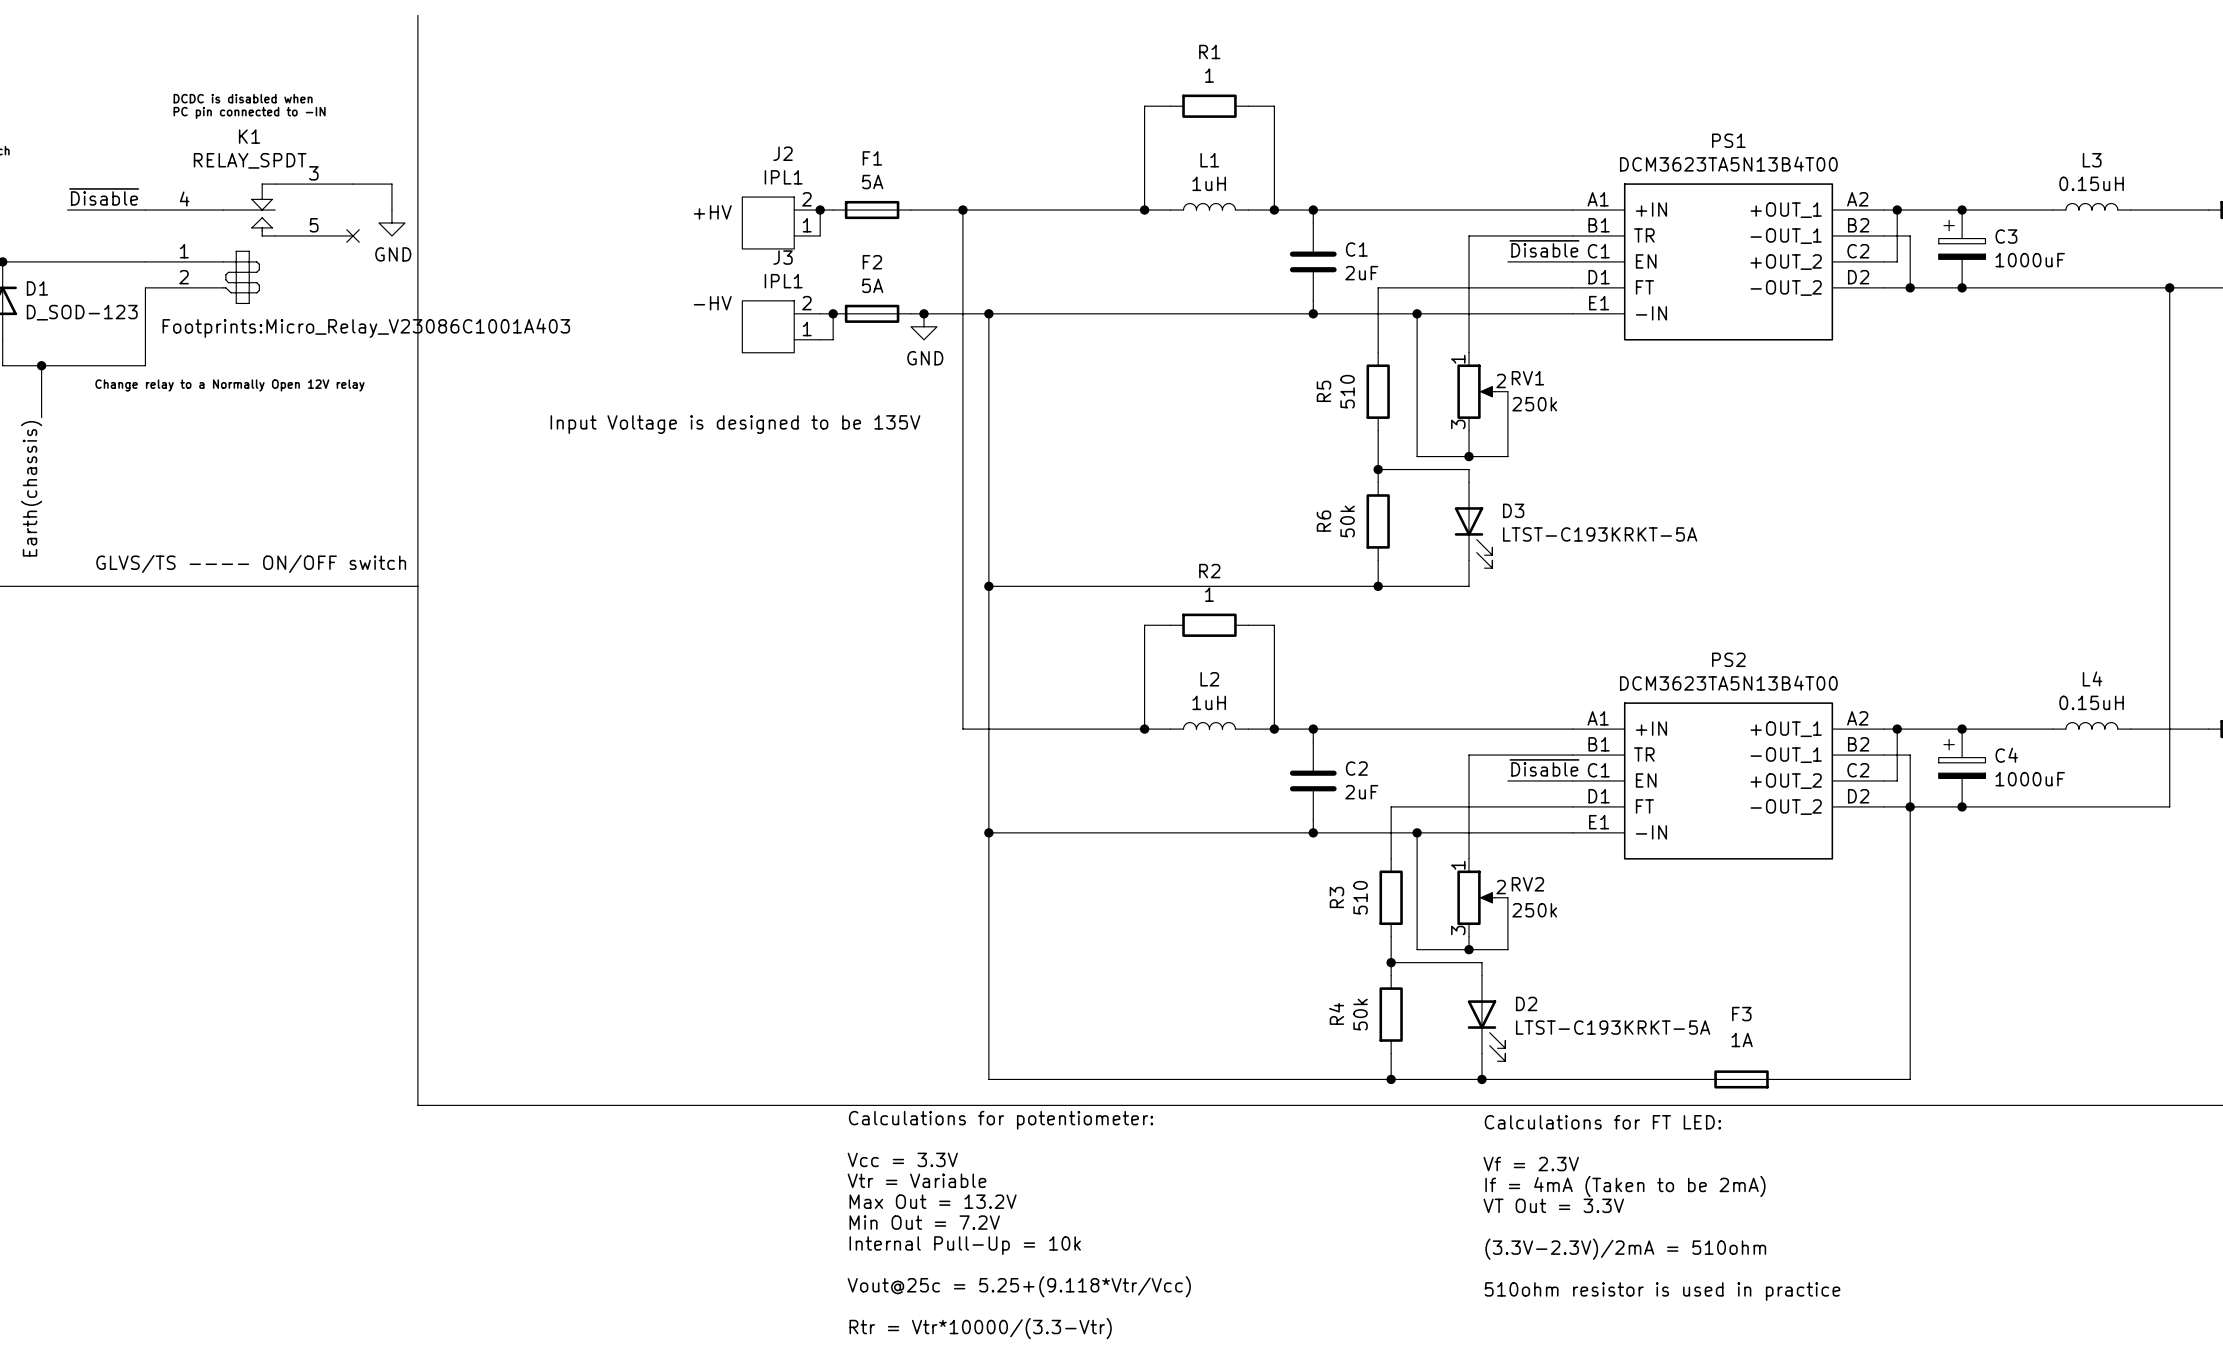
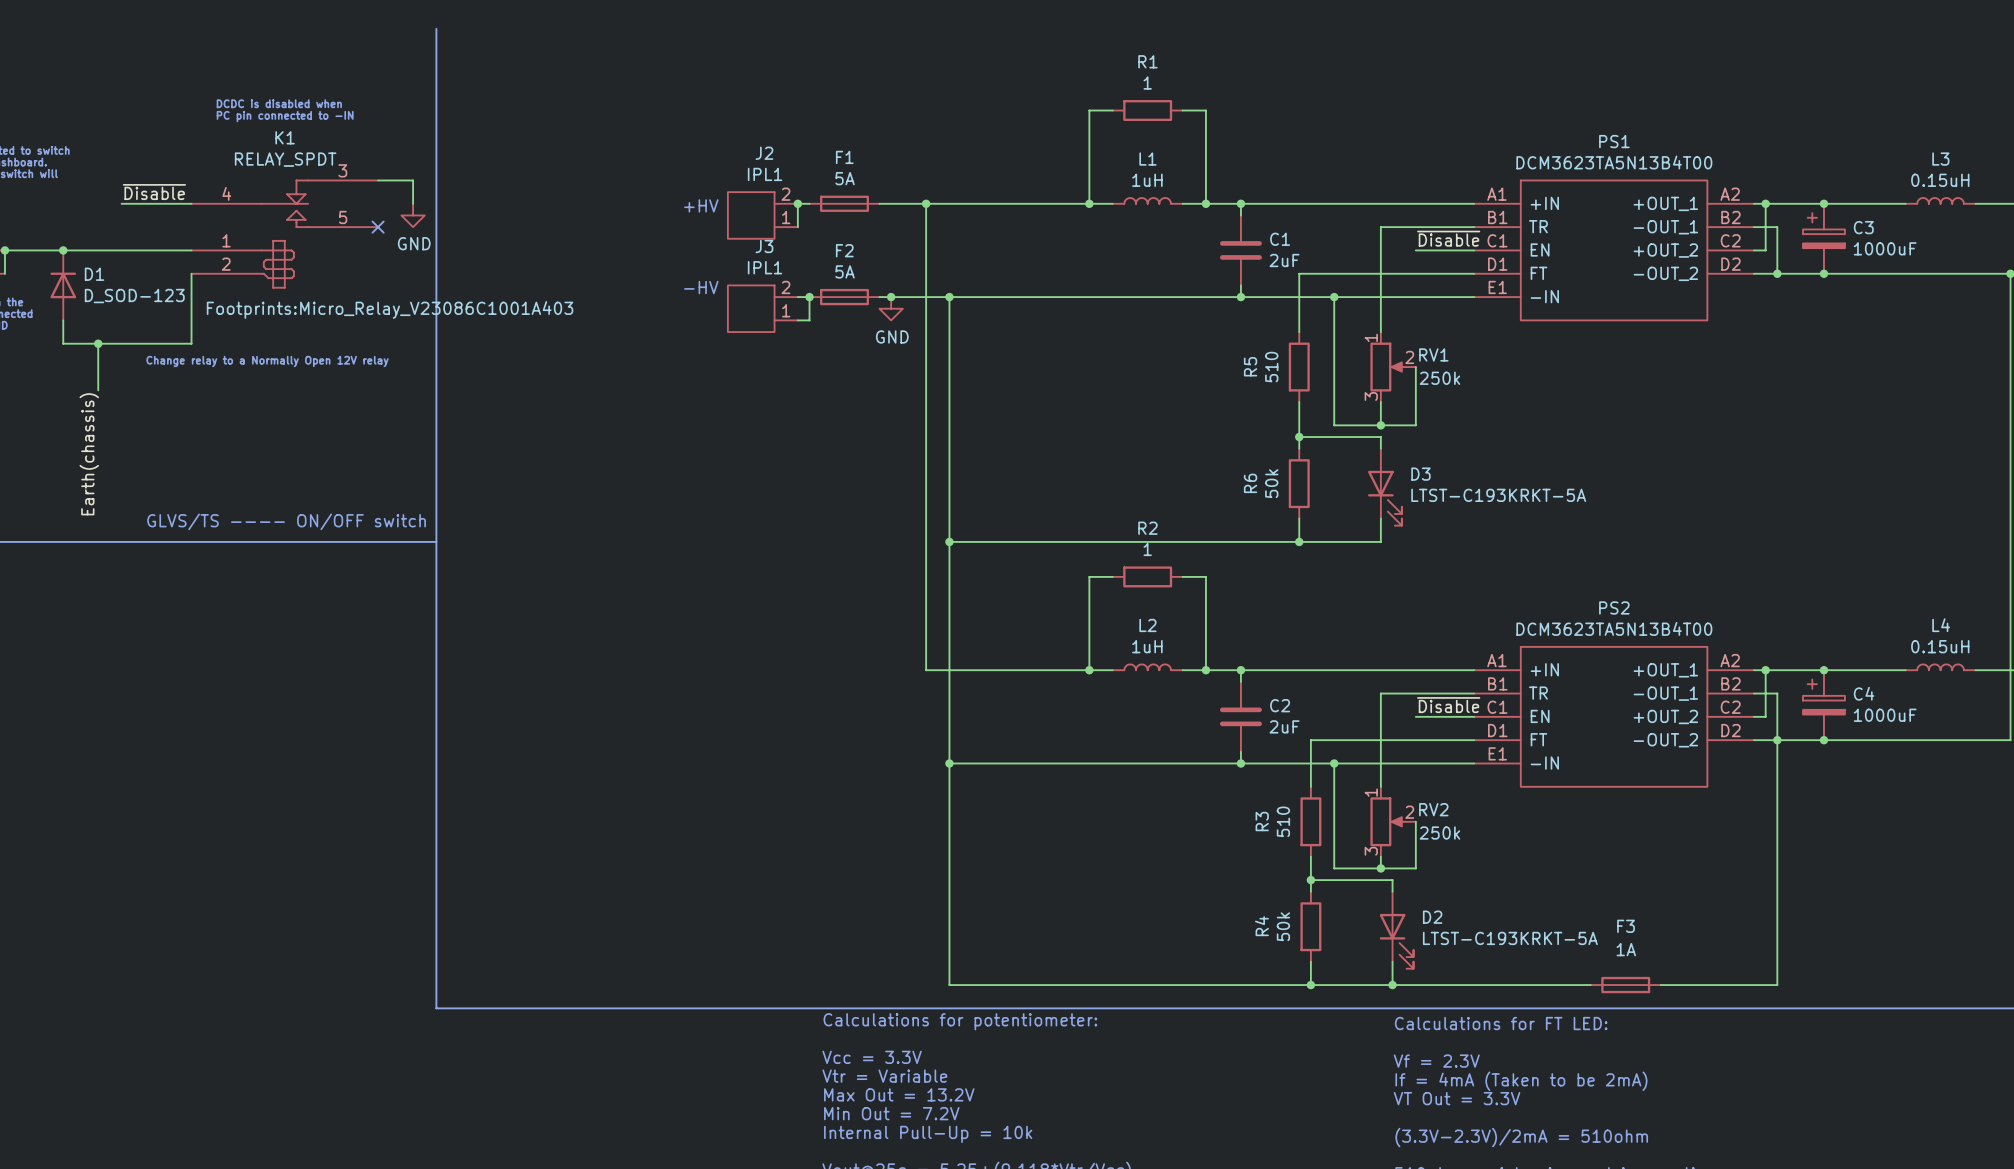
text: Input Voltage is designed to be 135V (735, 424) -> none

